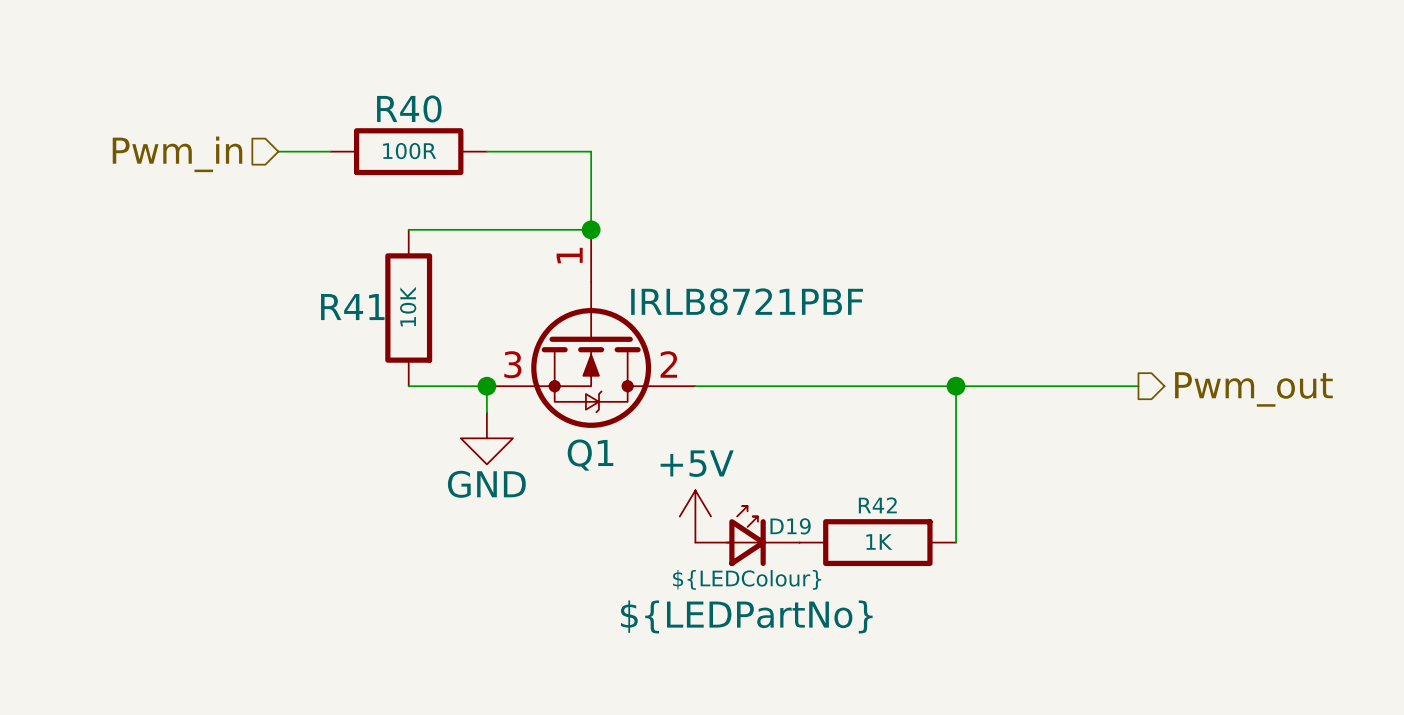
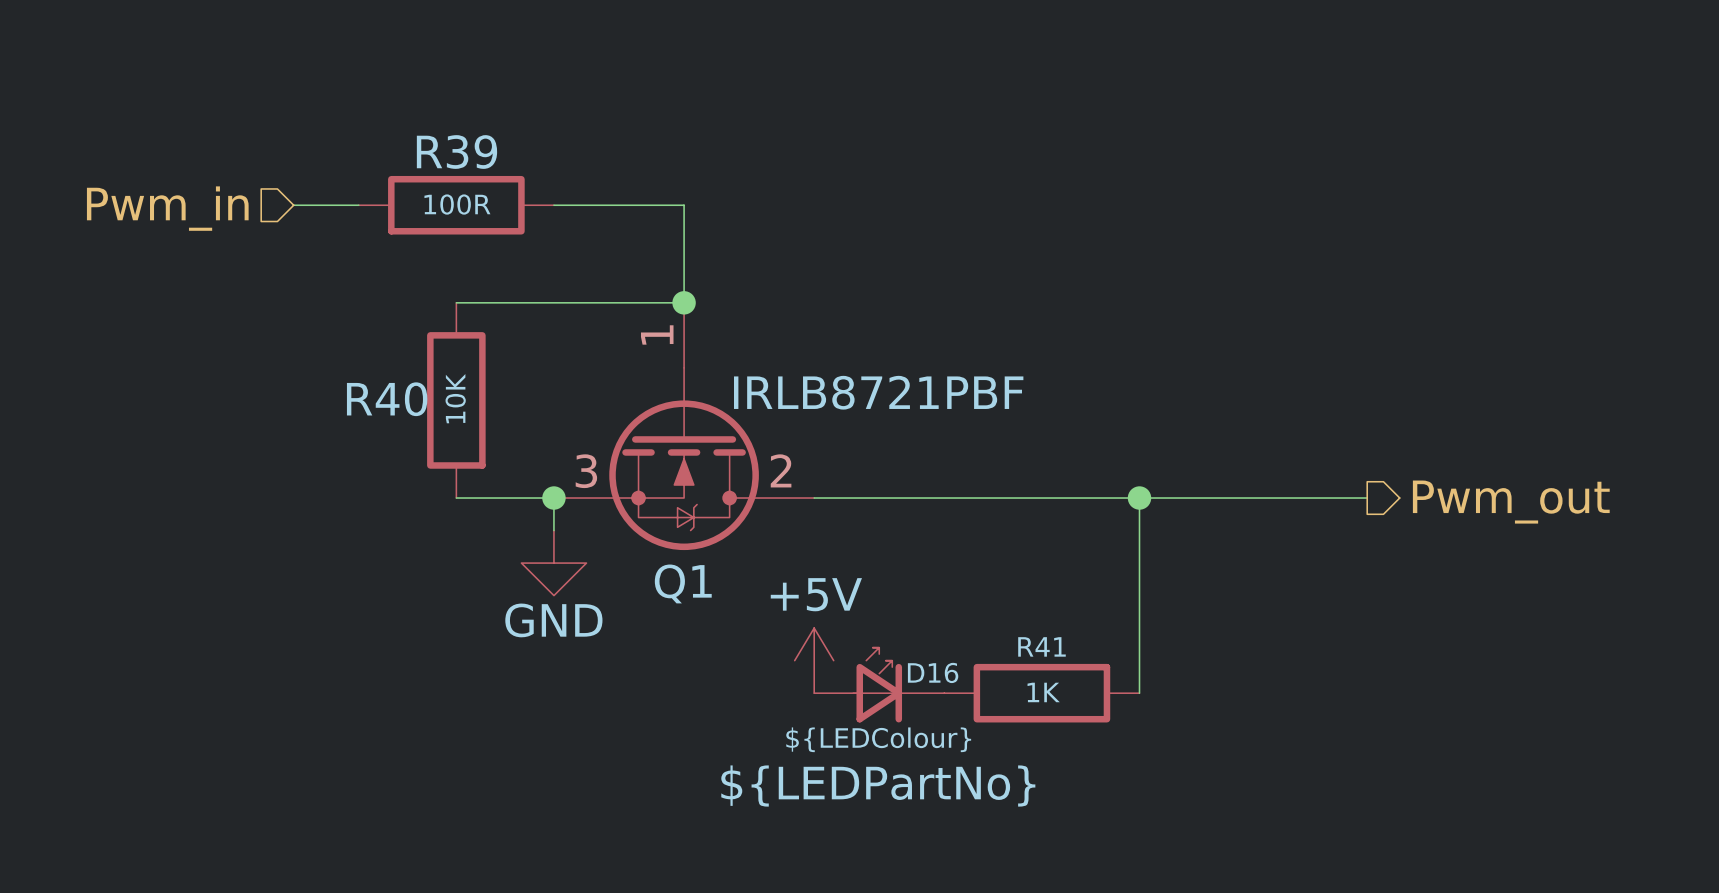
R40 name: R40 (409, 108) -> R39 (456, 152)
R41 name: R41 (352, 307) -> R40 (387, 399)
R42 name: R42 (877, 505) -> R41 (1041, 646)
D19 name: D19 (790, 526) -> D16 (933, 672)

